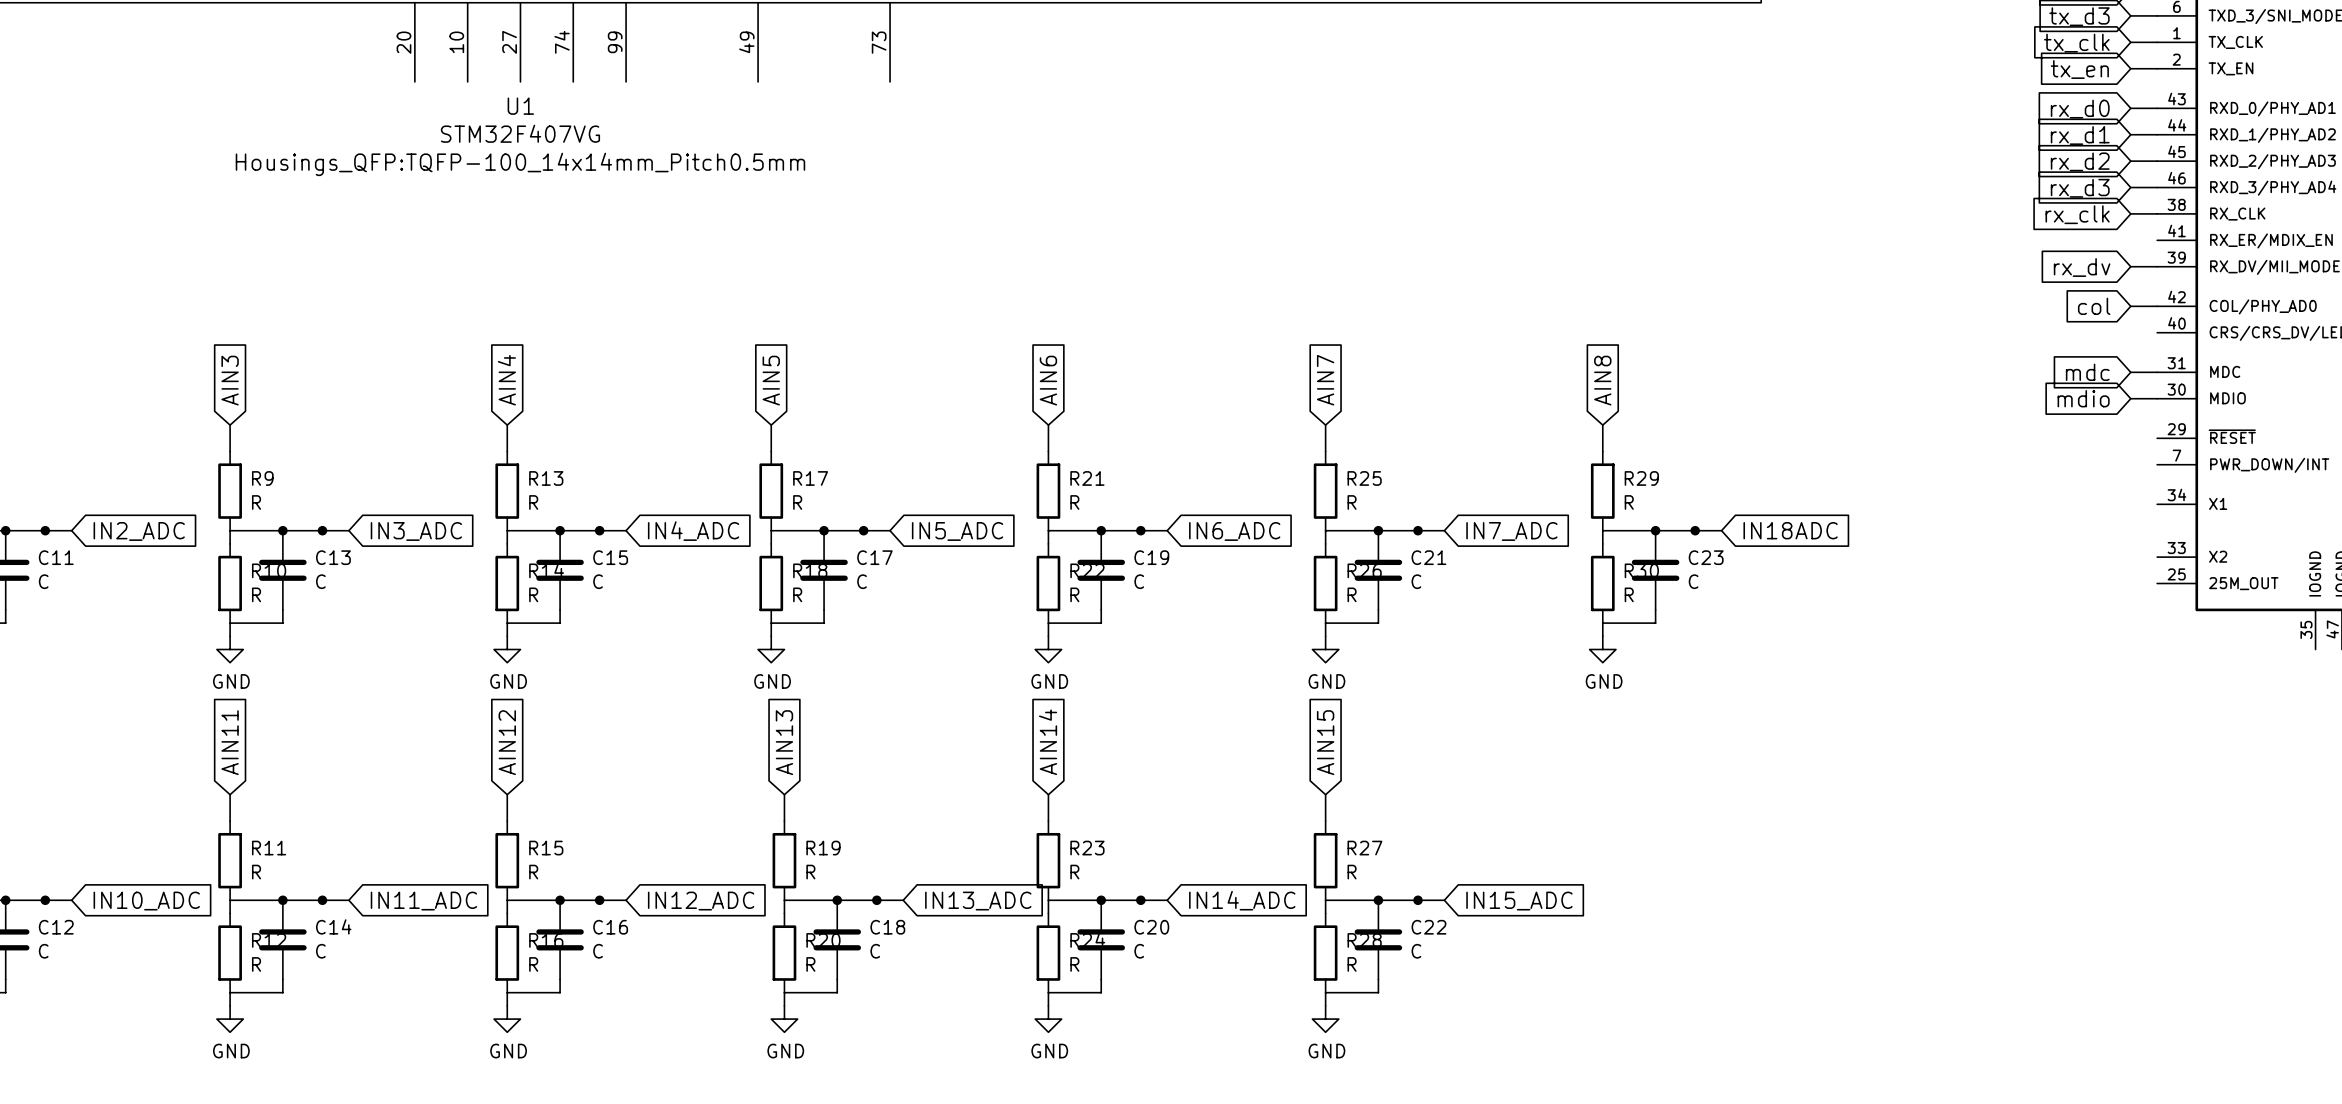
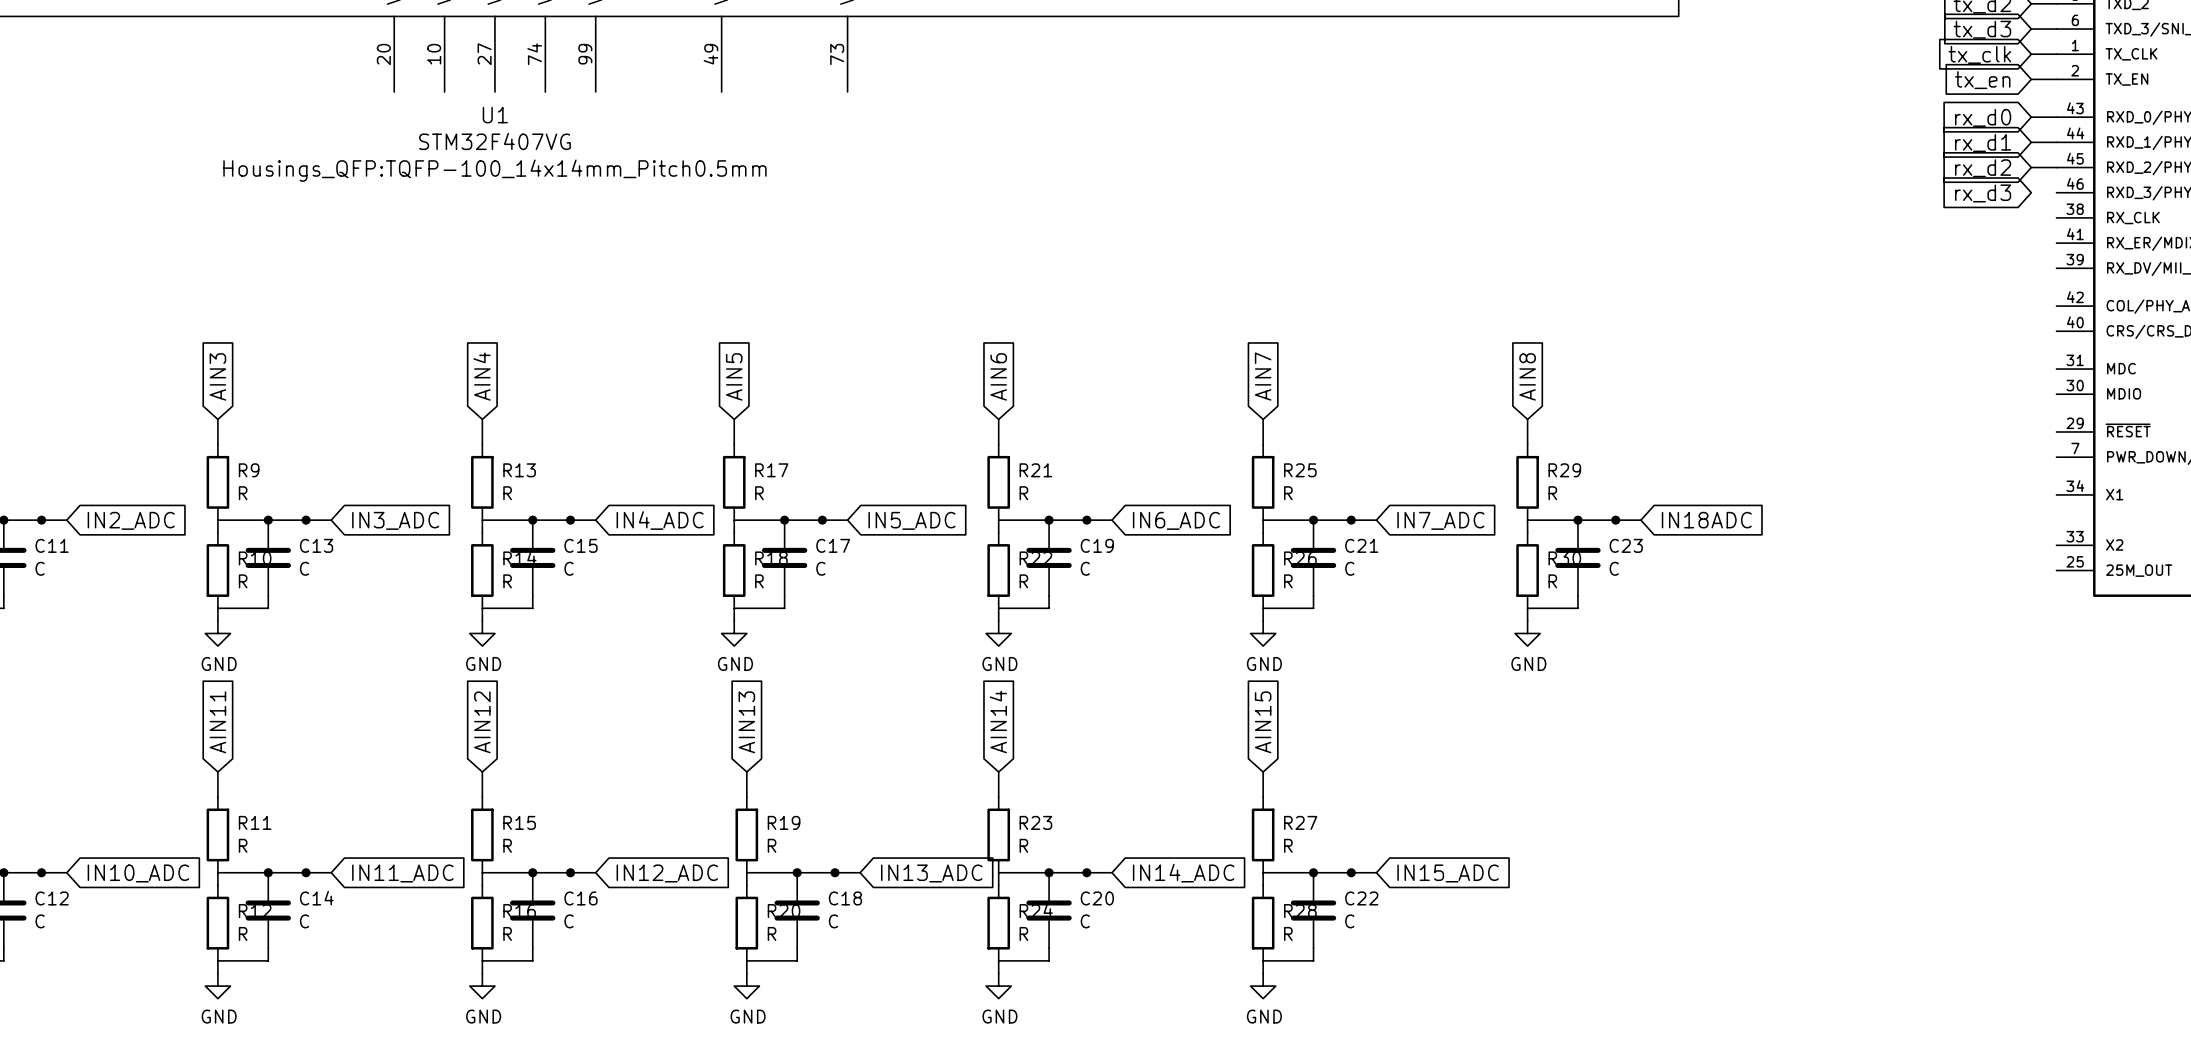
wire: (2130, 187) (2157, 187) -> none
wire: (2130, 213) (2157, 213) -> none
global label: rx_clk (2077, 214) -> none
wire: (2130, 266) (2157, 266) -> none
global label: rx_dv (2082, 267) -> none
global label: col (2094, 306) -> none
wire: (2130, 306) (2157, 306) -> none
global label: mdc (2087, 372) -> none
wire: (2130, 372) (2157, 372) -> none
global label: mdio (2083, 398) -> none
wire: (2130, 398) (2157, 398) -> none

